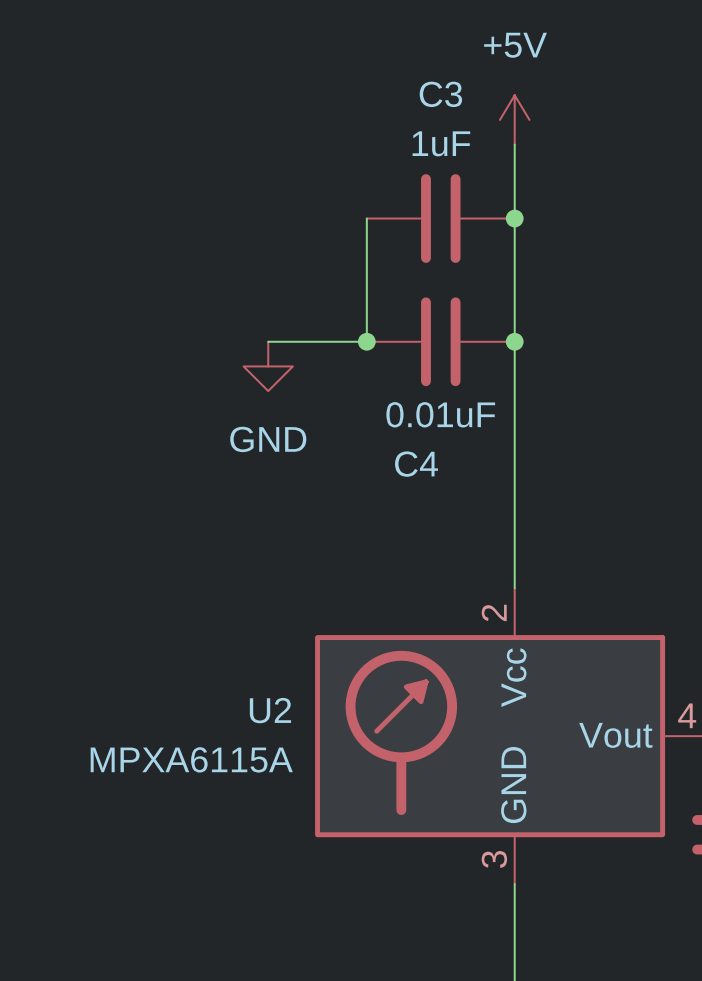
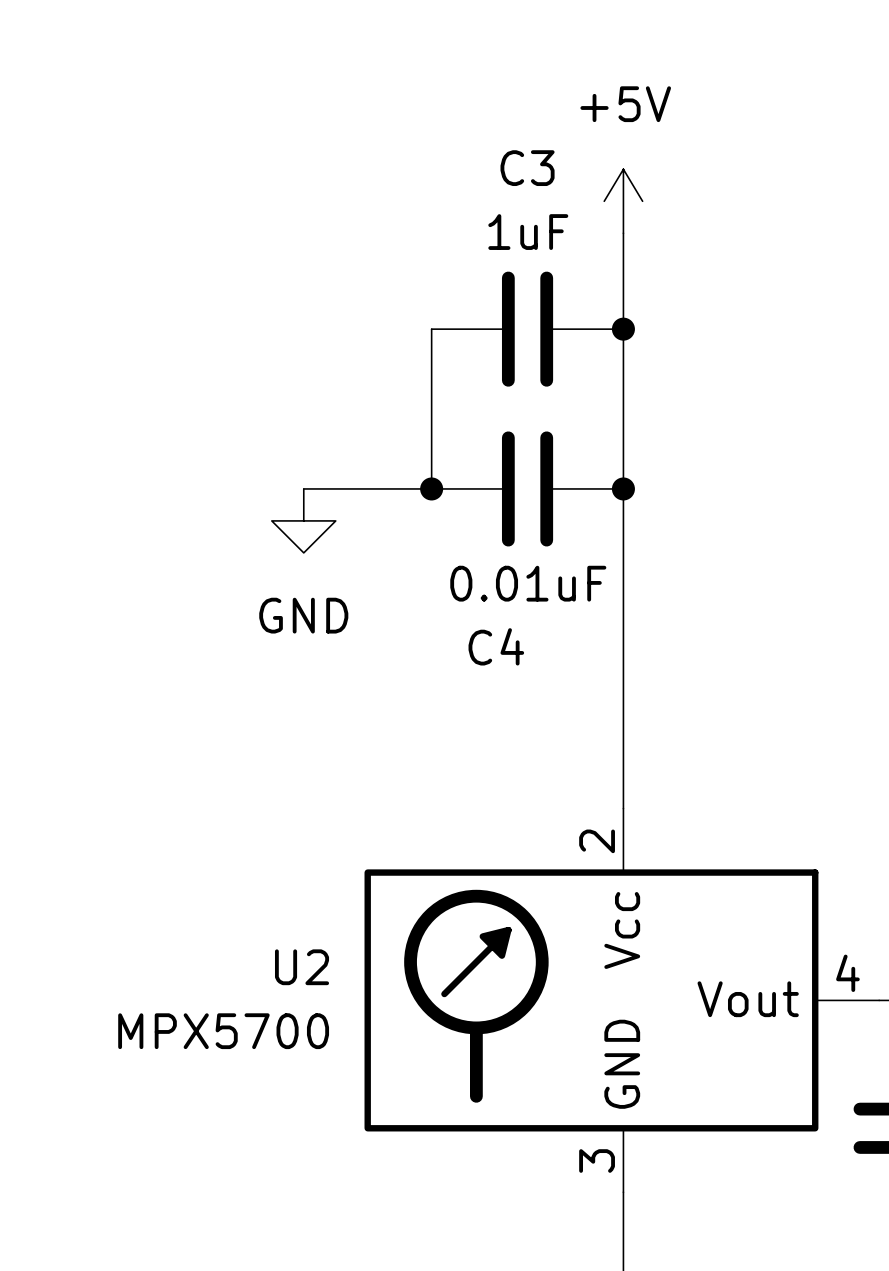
U2 value: MPXA6115A (191, 759) -> MPX5700 (223, 1031)

